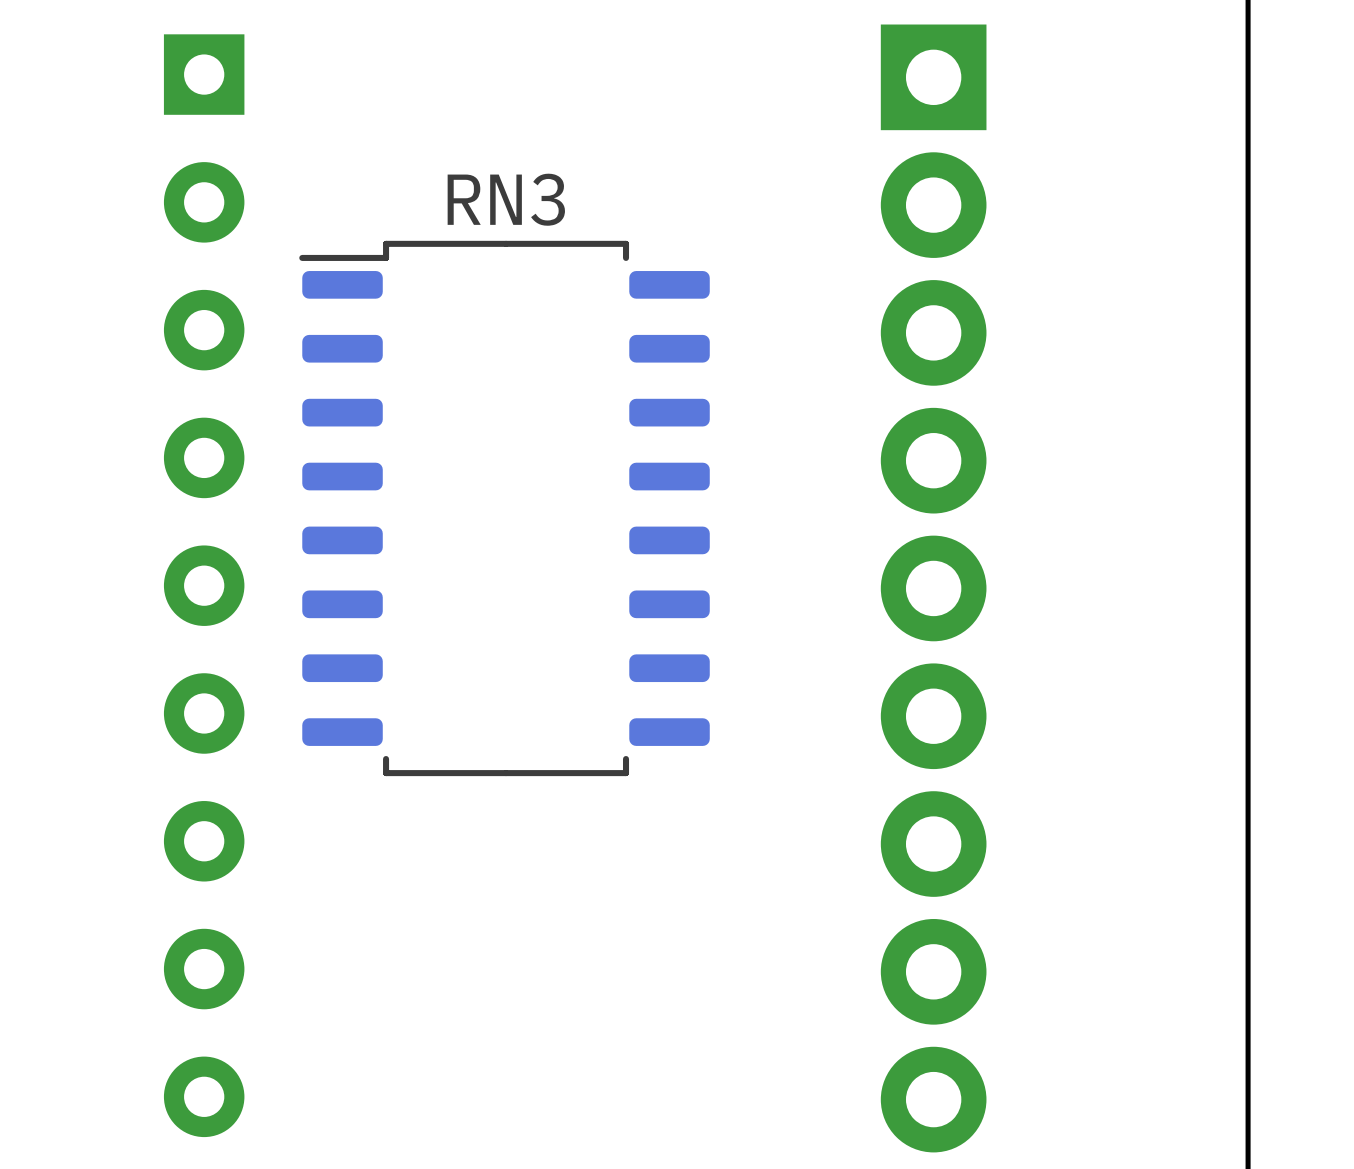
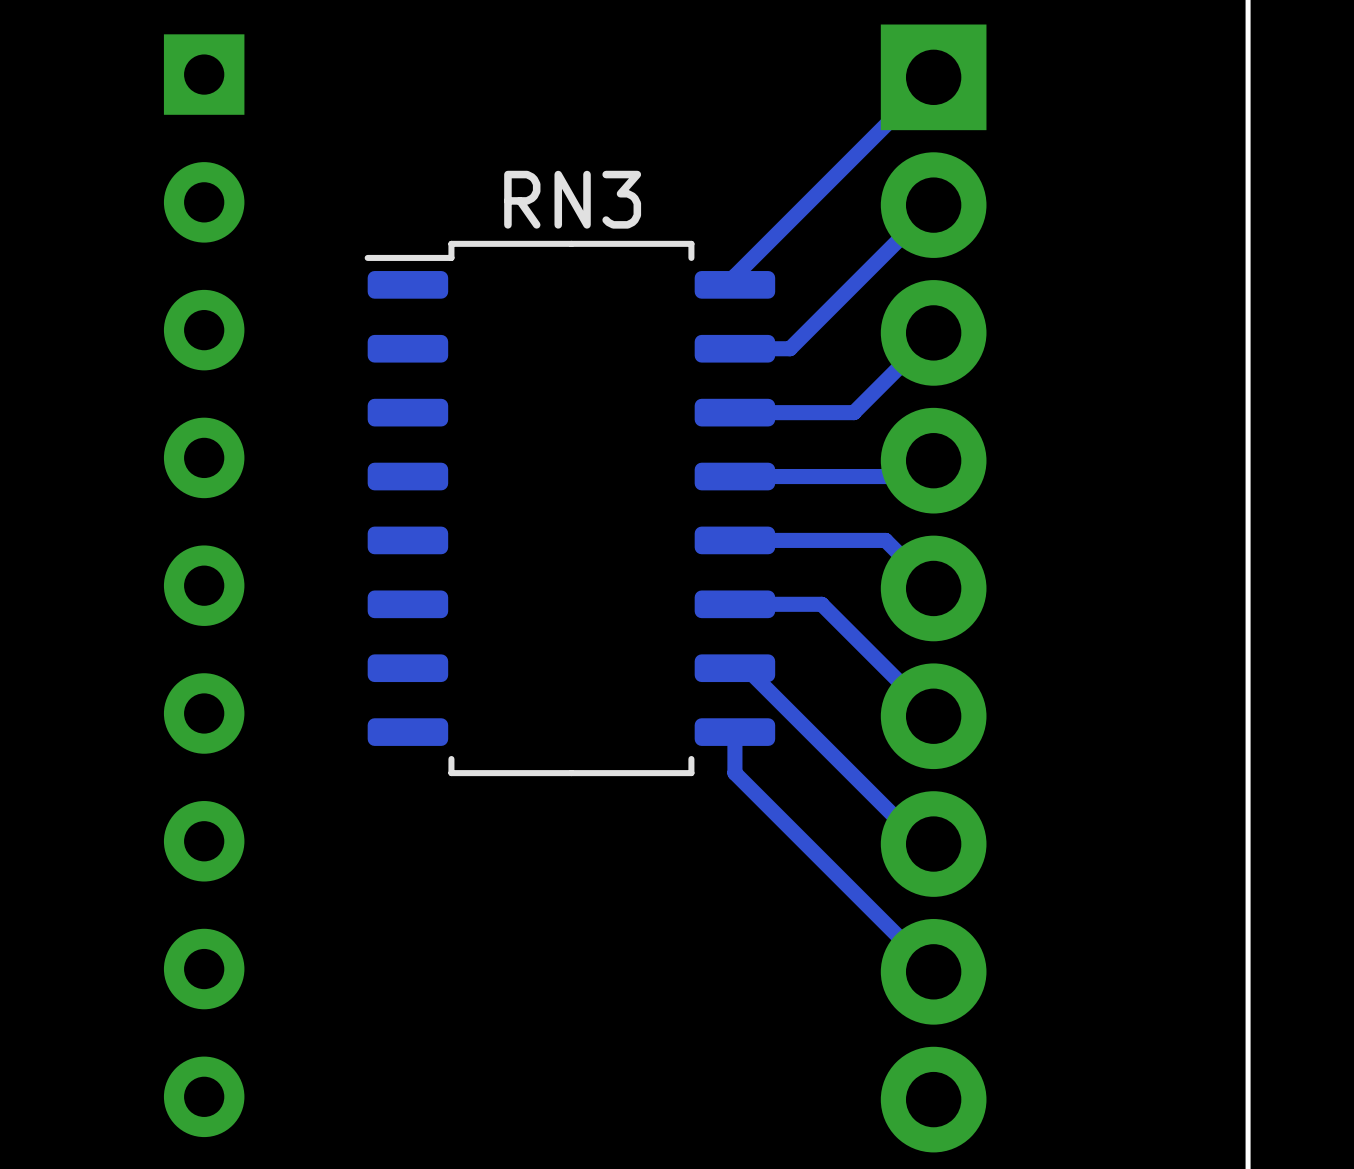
track: none -> (933, 77) (734, 276) (734, 284)
track: none -> (933, 205) (790, 348) (734, 348)
track: none -> (933, 332) (853, 412) (734, 412)
track: none -> (933, 460) (917, 476) (734, 476)
RN3 position: (504, 508) -> (569, 508)
track: none -> (734, 540) (885, 540) (933, 588)
track: none -> (734, 604) (821, 604) (933, 716)
track: none -> (734, 668) (746, 668) (921, 844) (933, 844)
track: none -> (734, 732) (734, 773) (933, 971)

